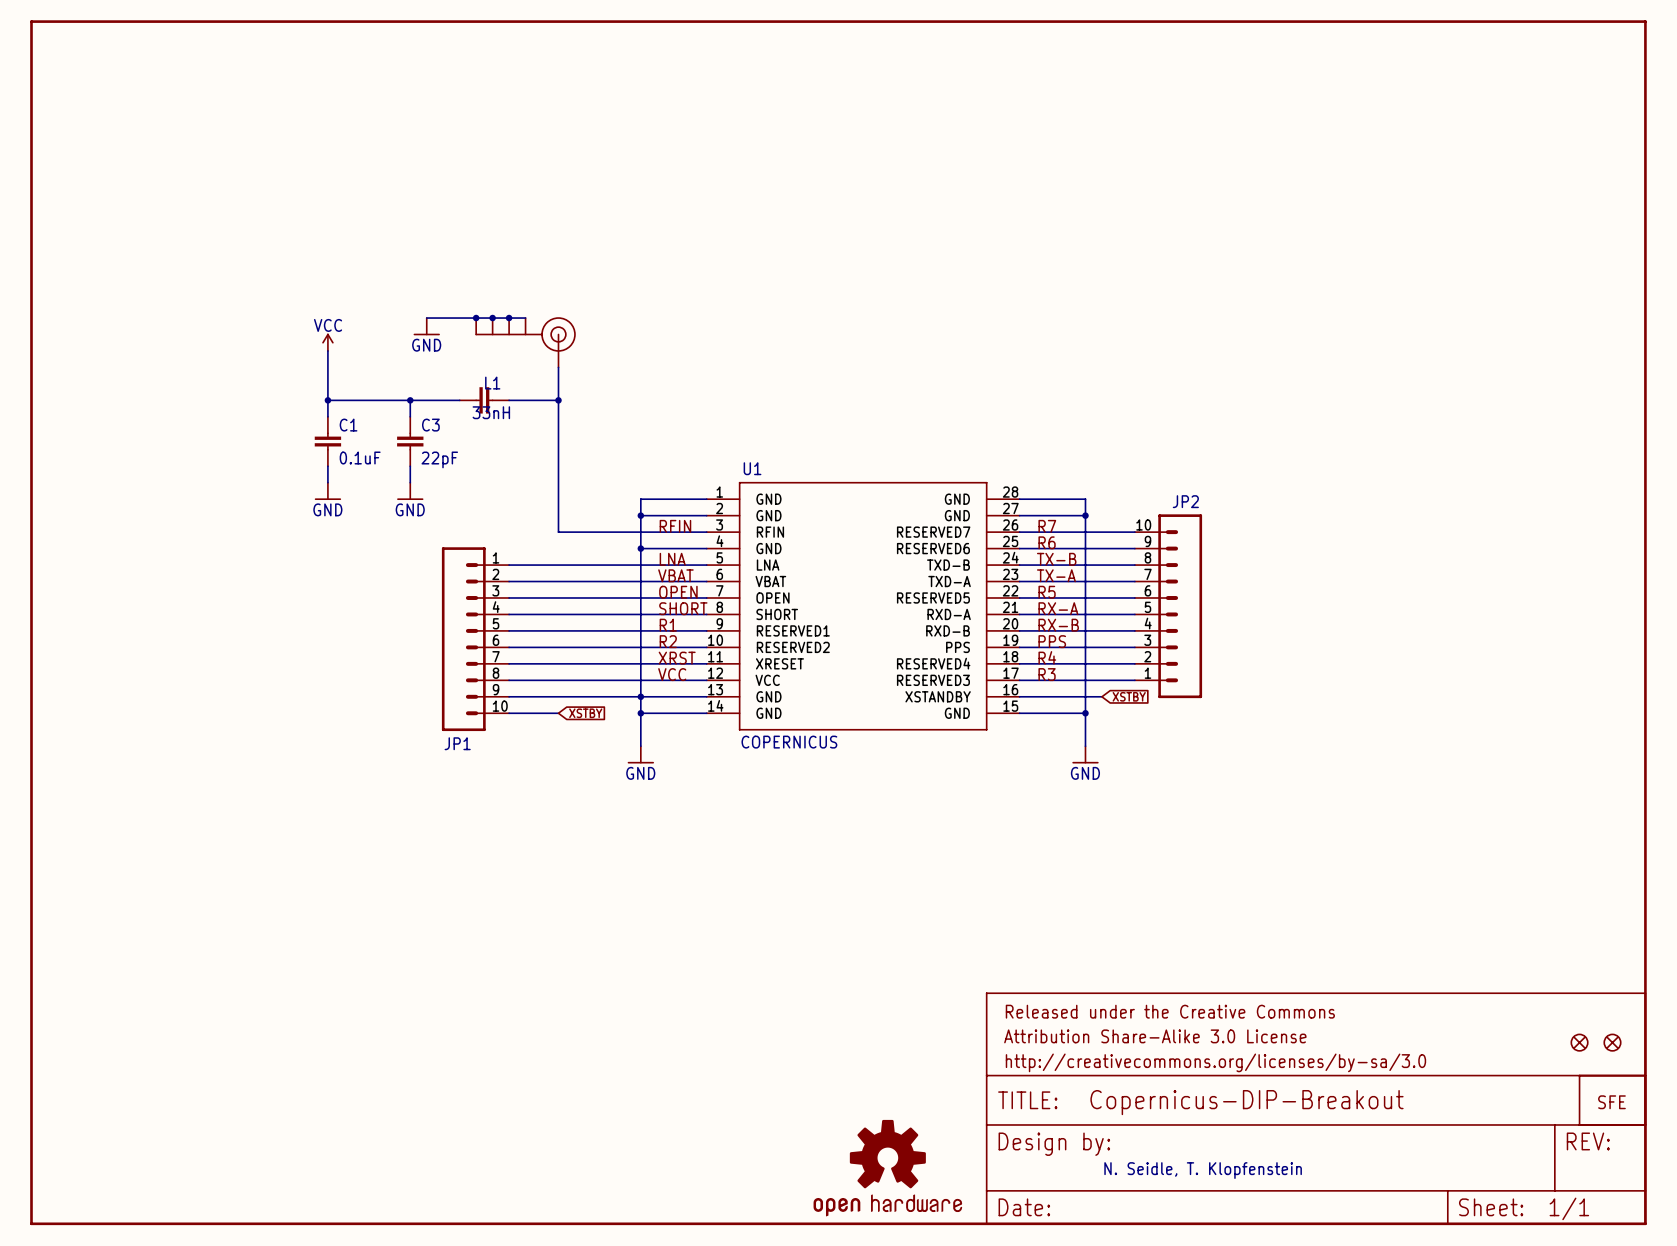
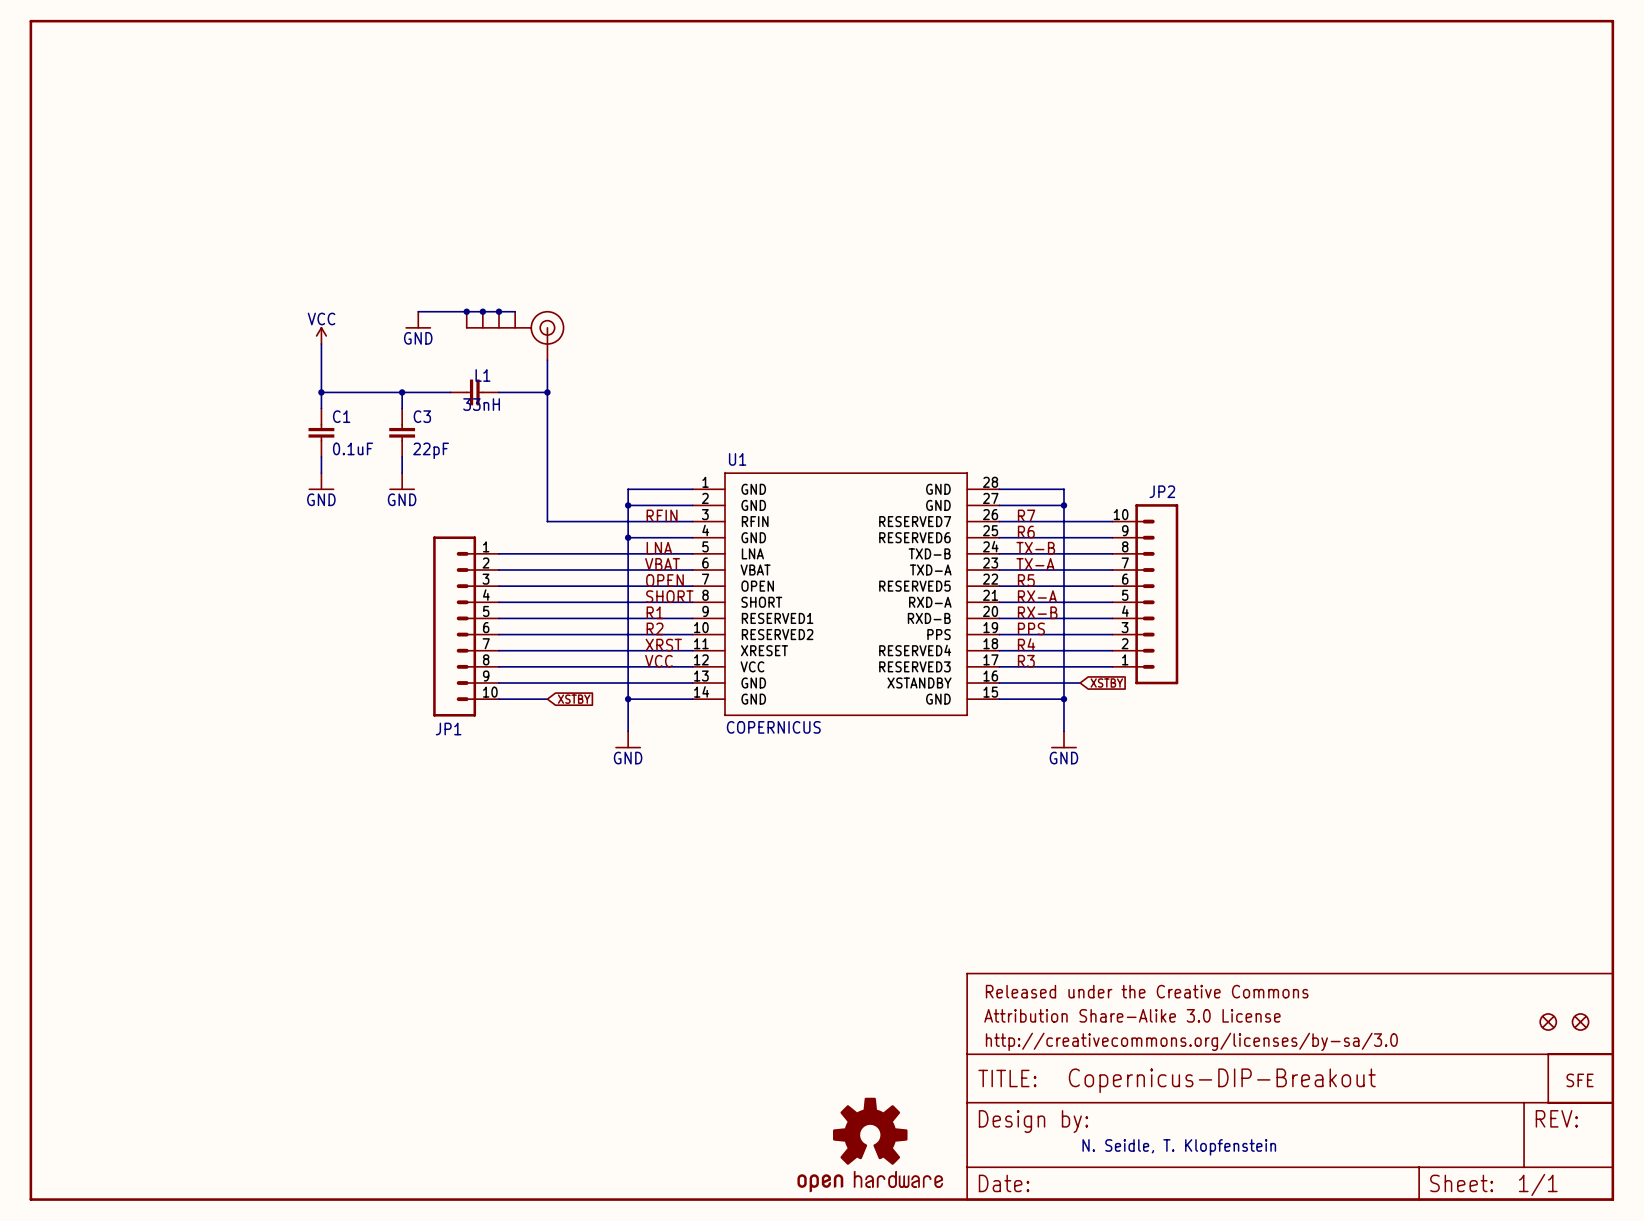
junction: (640, 696) -> none

